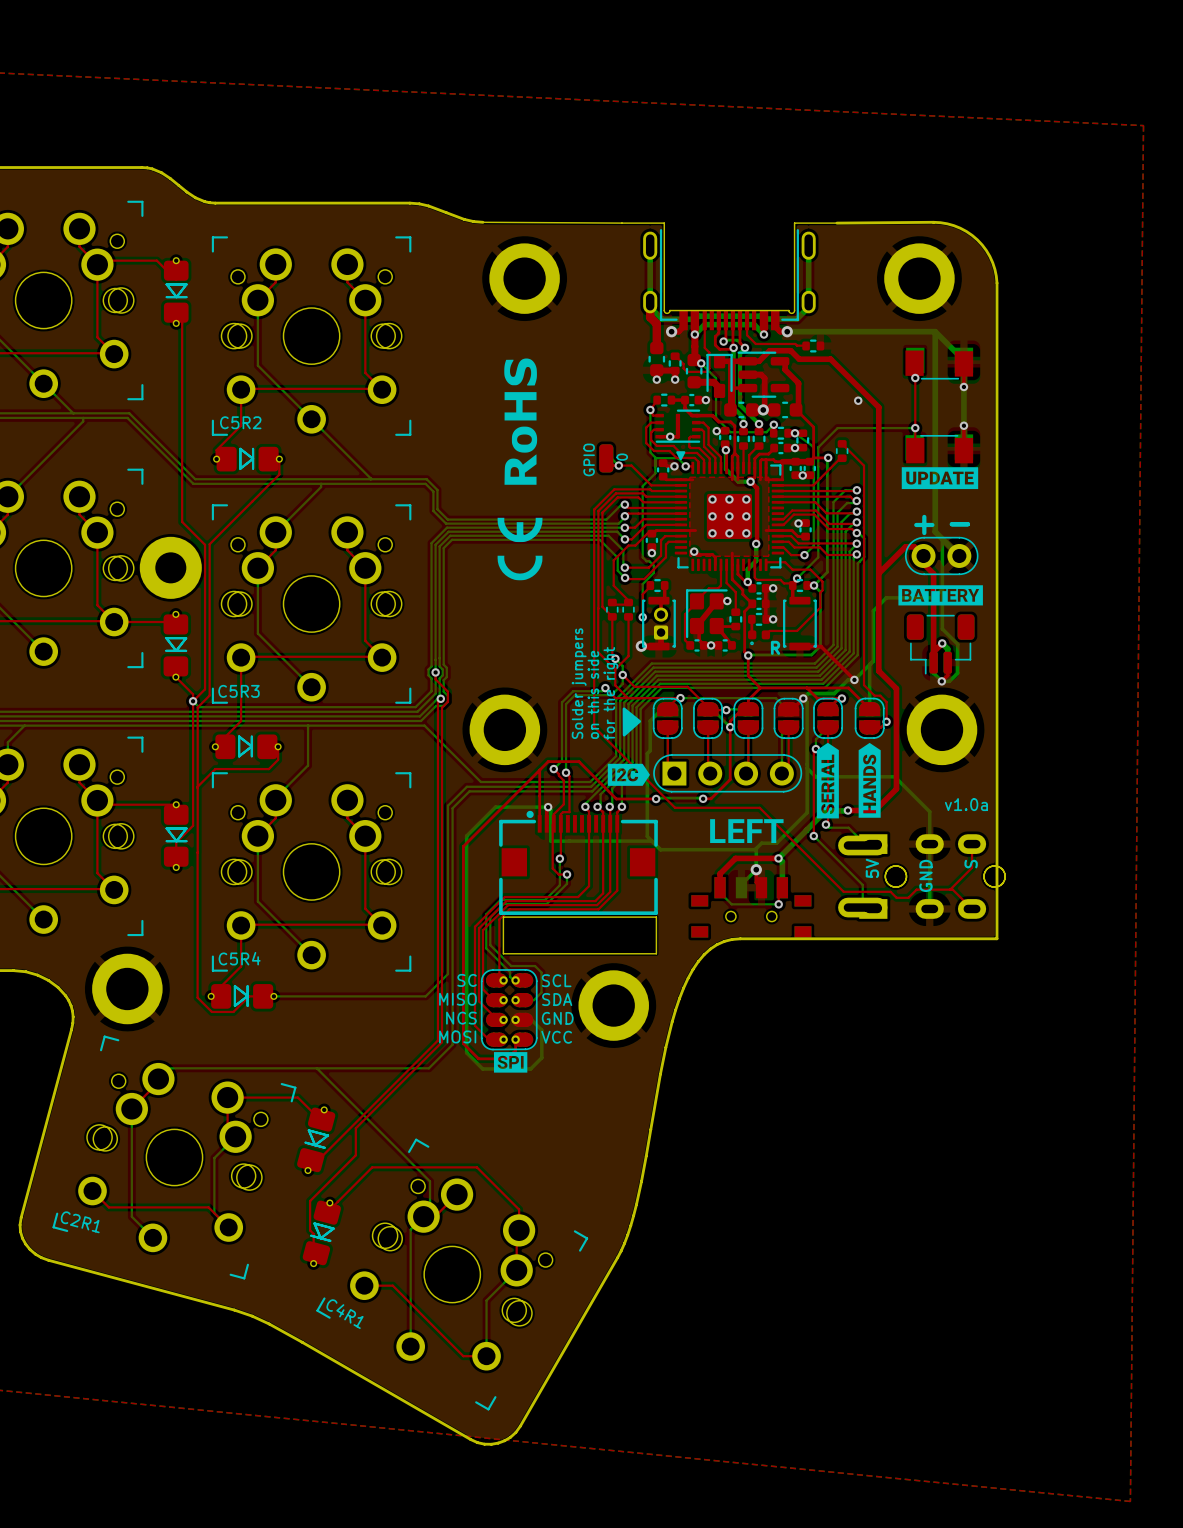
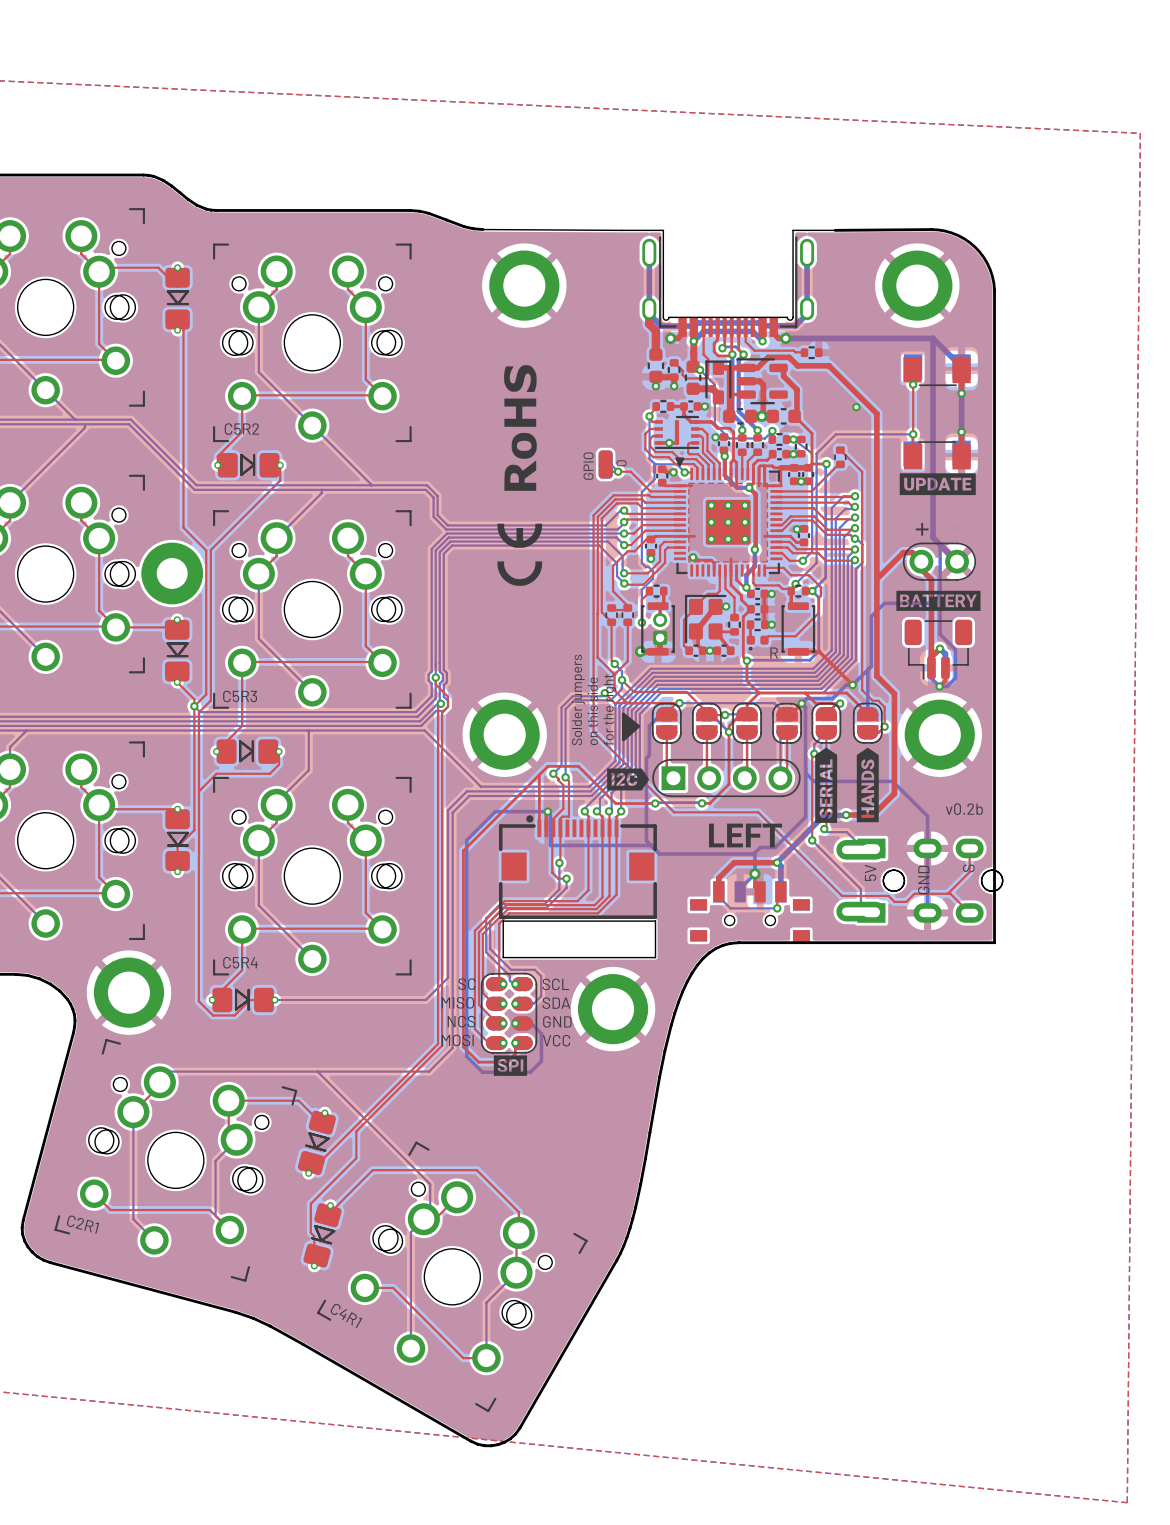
text: v1.0a (966, 804) -> v0.2b (964, 809)

